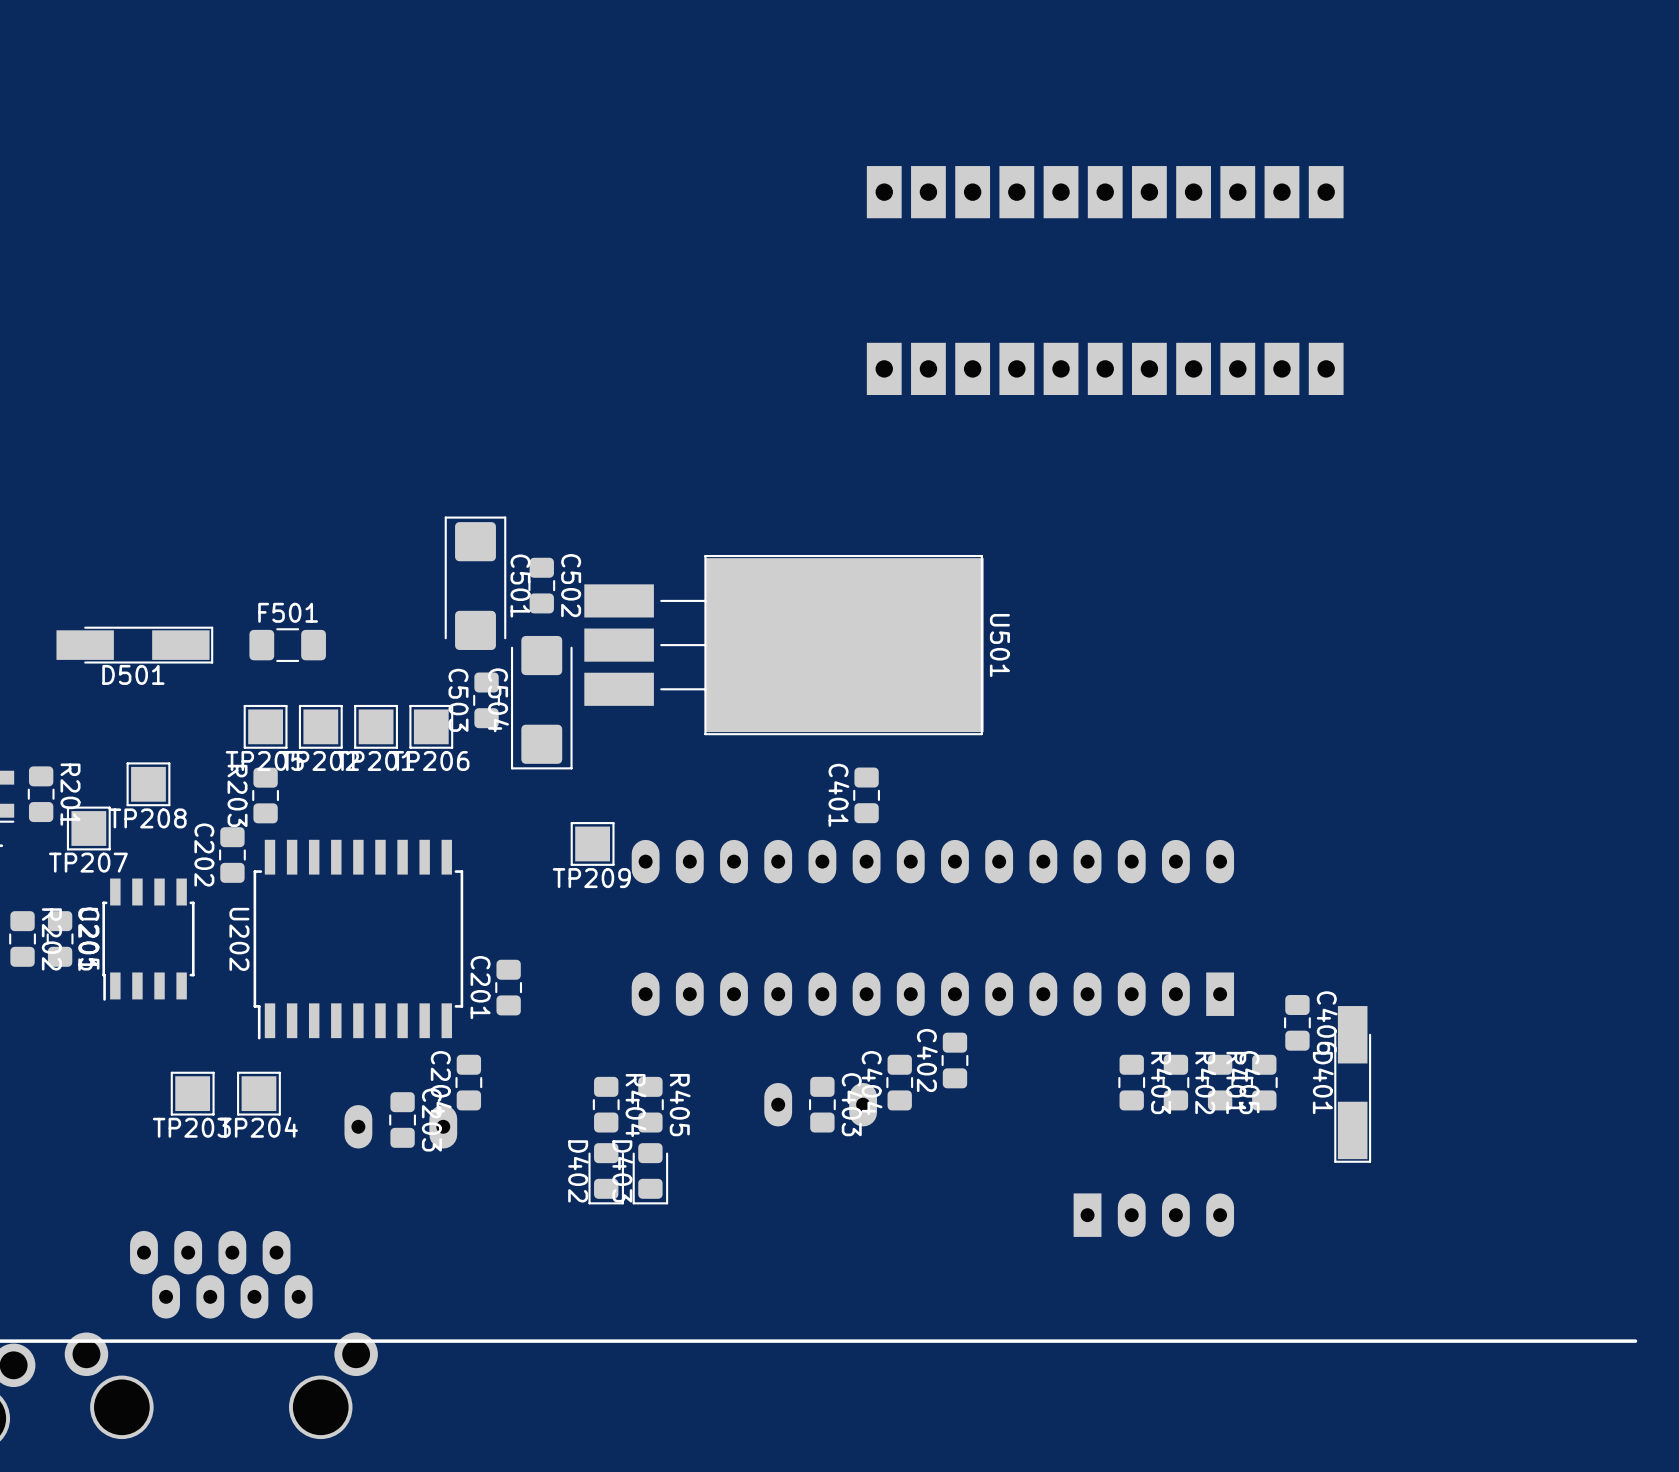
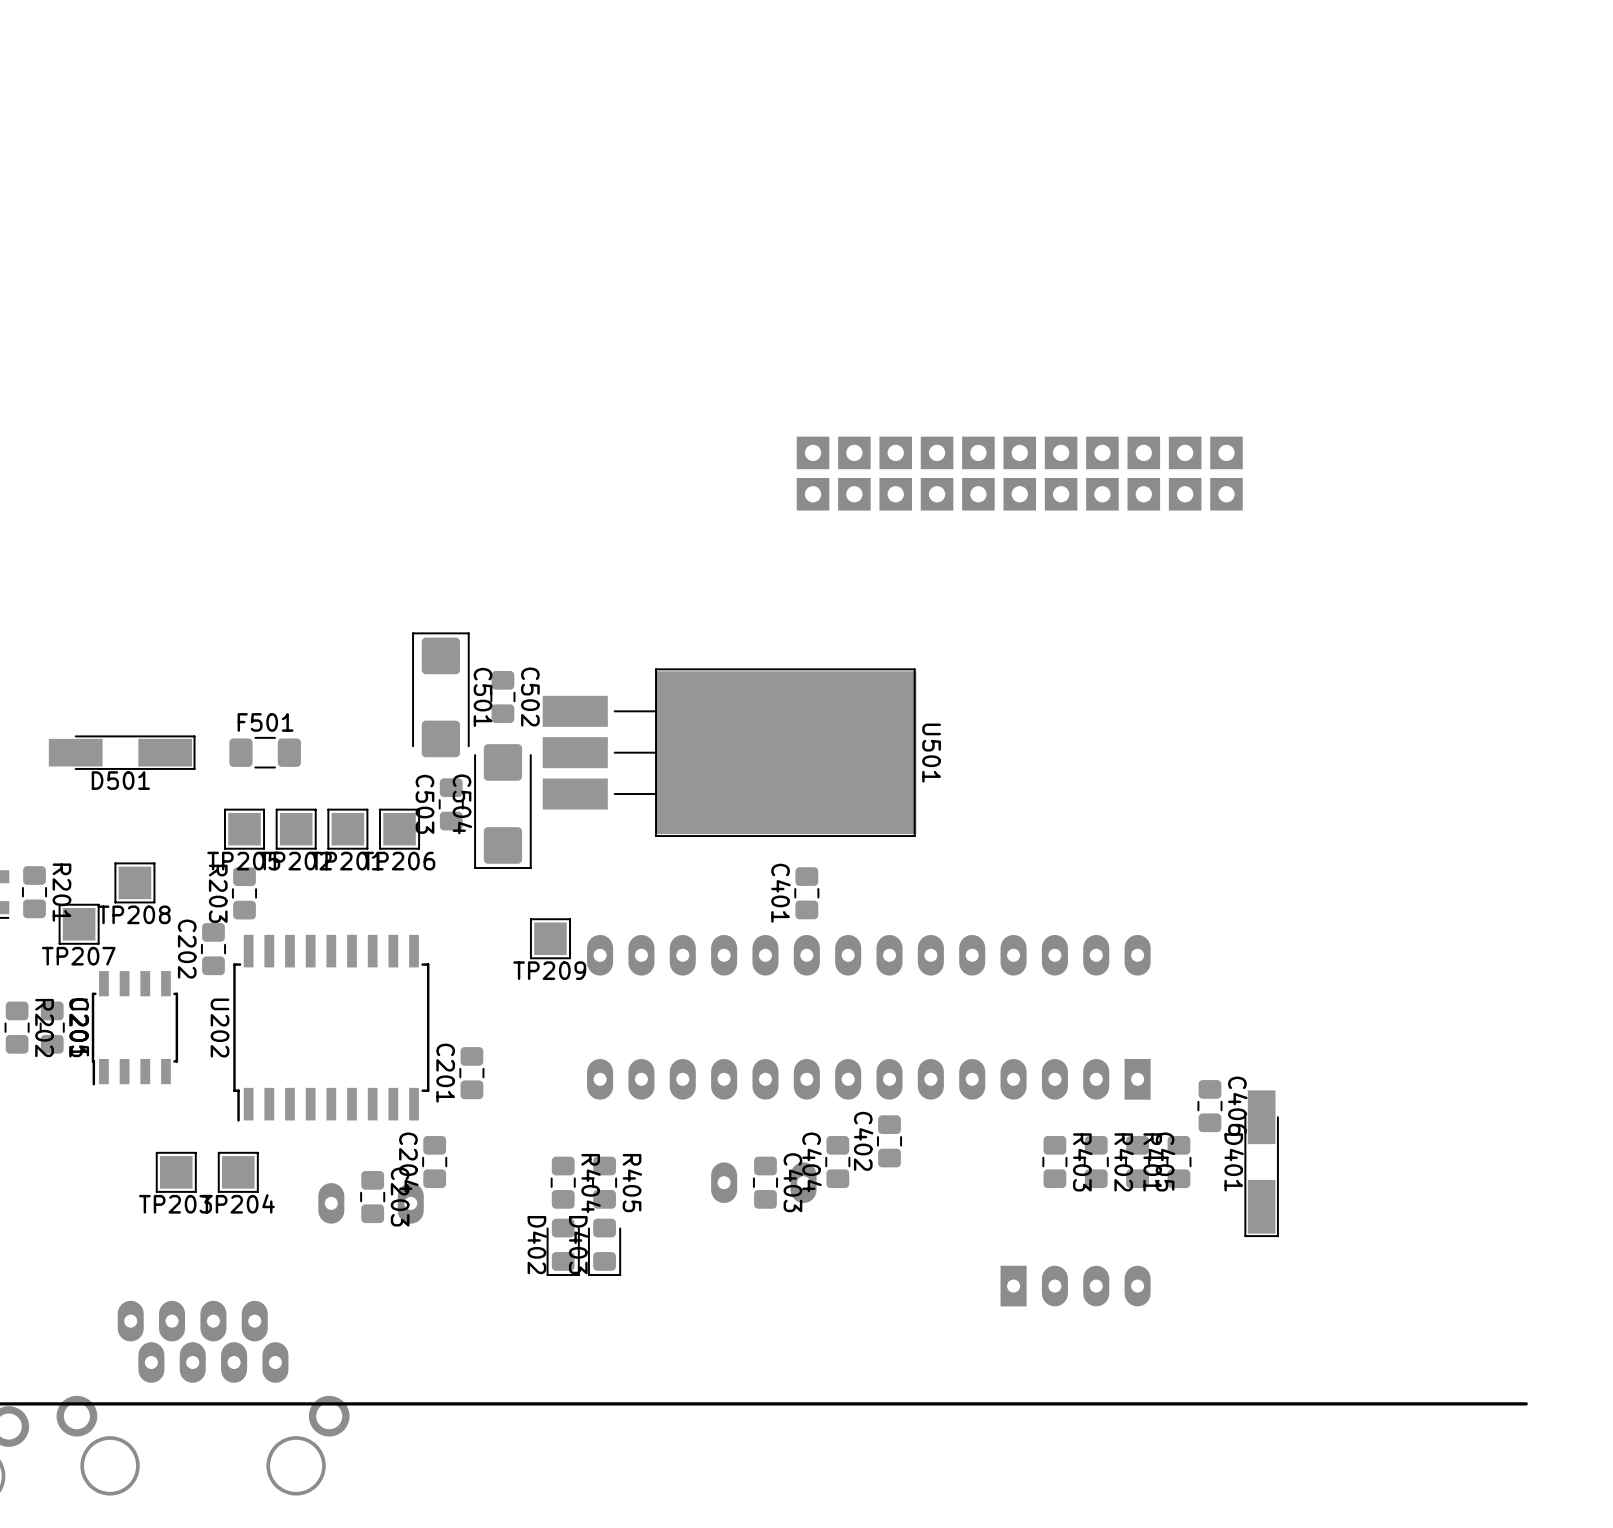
part: (1105, 192) -> none
part: none -> (1019, 473)
part: (1105, 368) -> none

